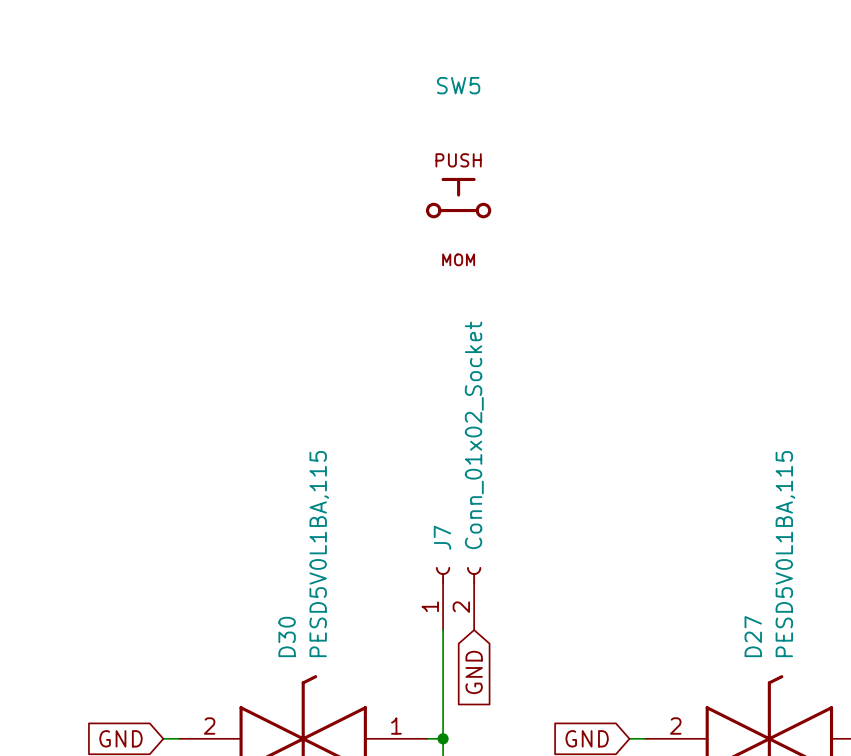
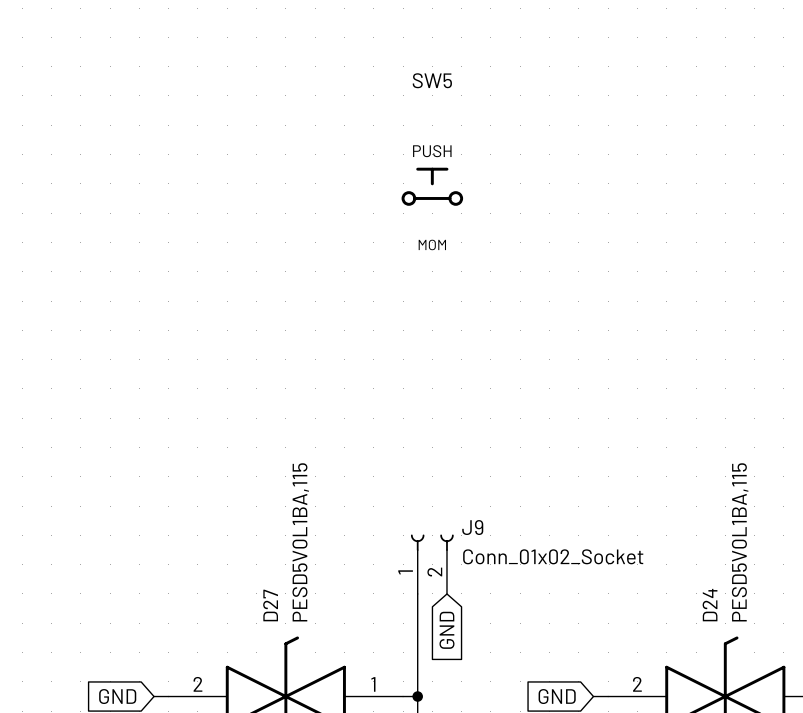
J7 value rotation: 0° (474, 435) -> 90° clockwise (553, 556)
J7 name: J7 (442, 537) -> J9 (472, 527)
D30 name: D30 (287, 636) -> D27 (270, 605)
D27 name: D27 (753, 636) -> D24 (710, 605)

